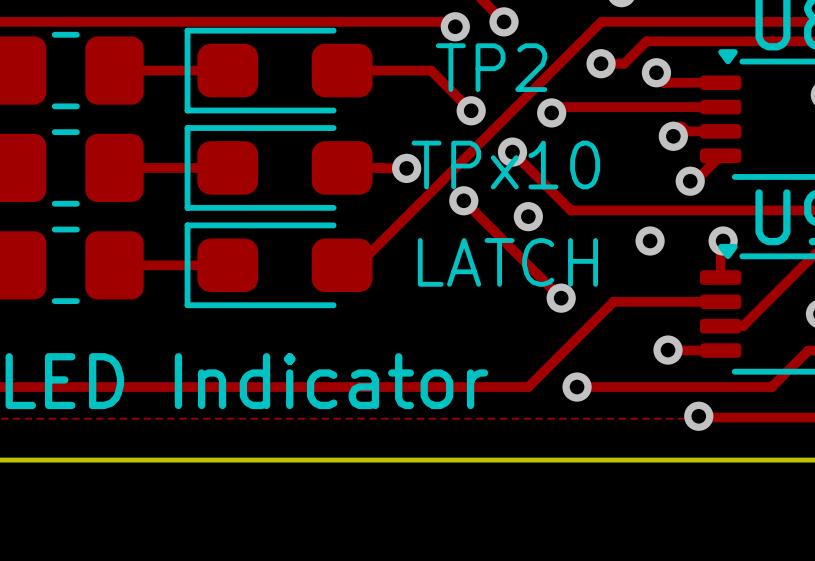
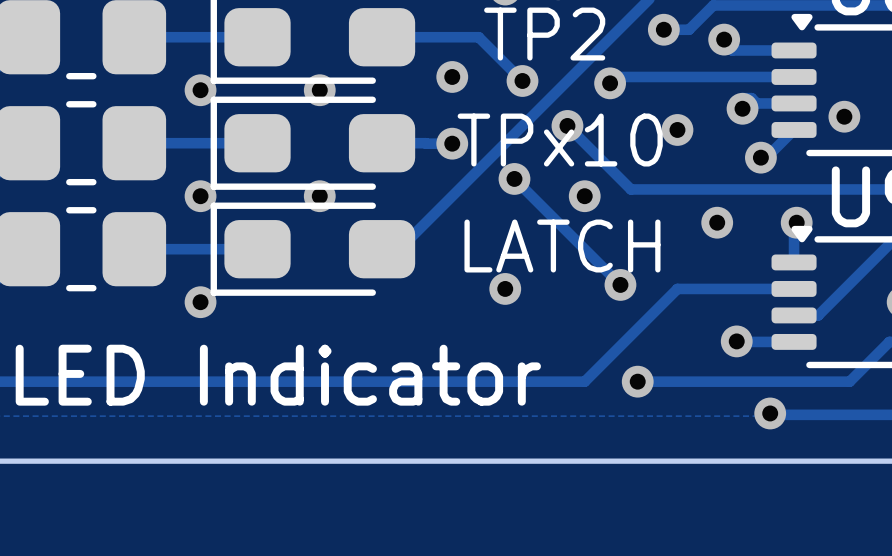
via: none -> (452, 76)
via: none -> (200, 90)
via: none -> (319, 90)
via: none -> (844, 116)
via: none -> (677, 129)
via: none -> (200, 196)
via: none -> (319, 196)
via: none -> (505, 288)
via: none -> (200, 302)

